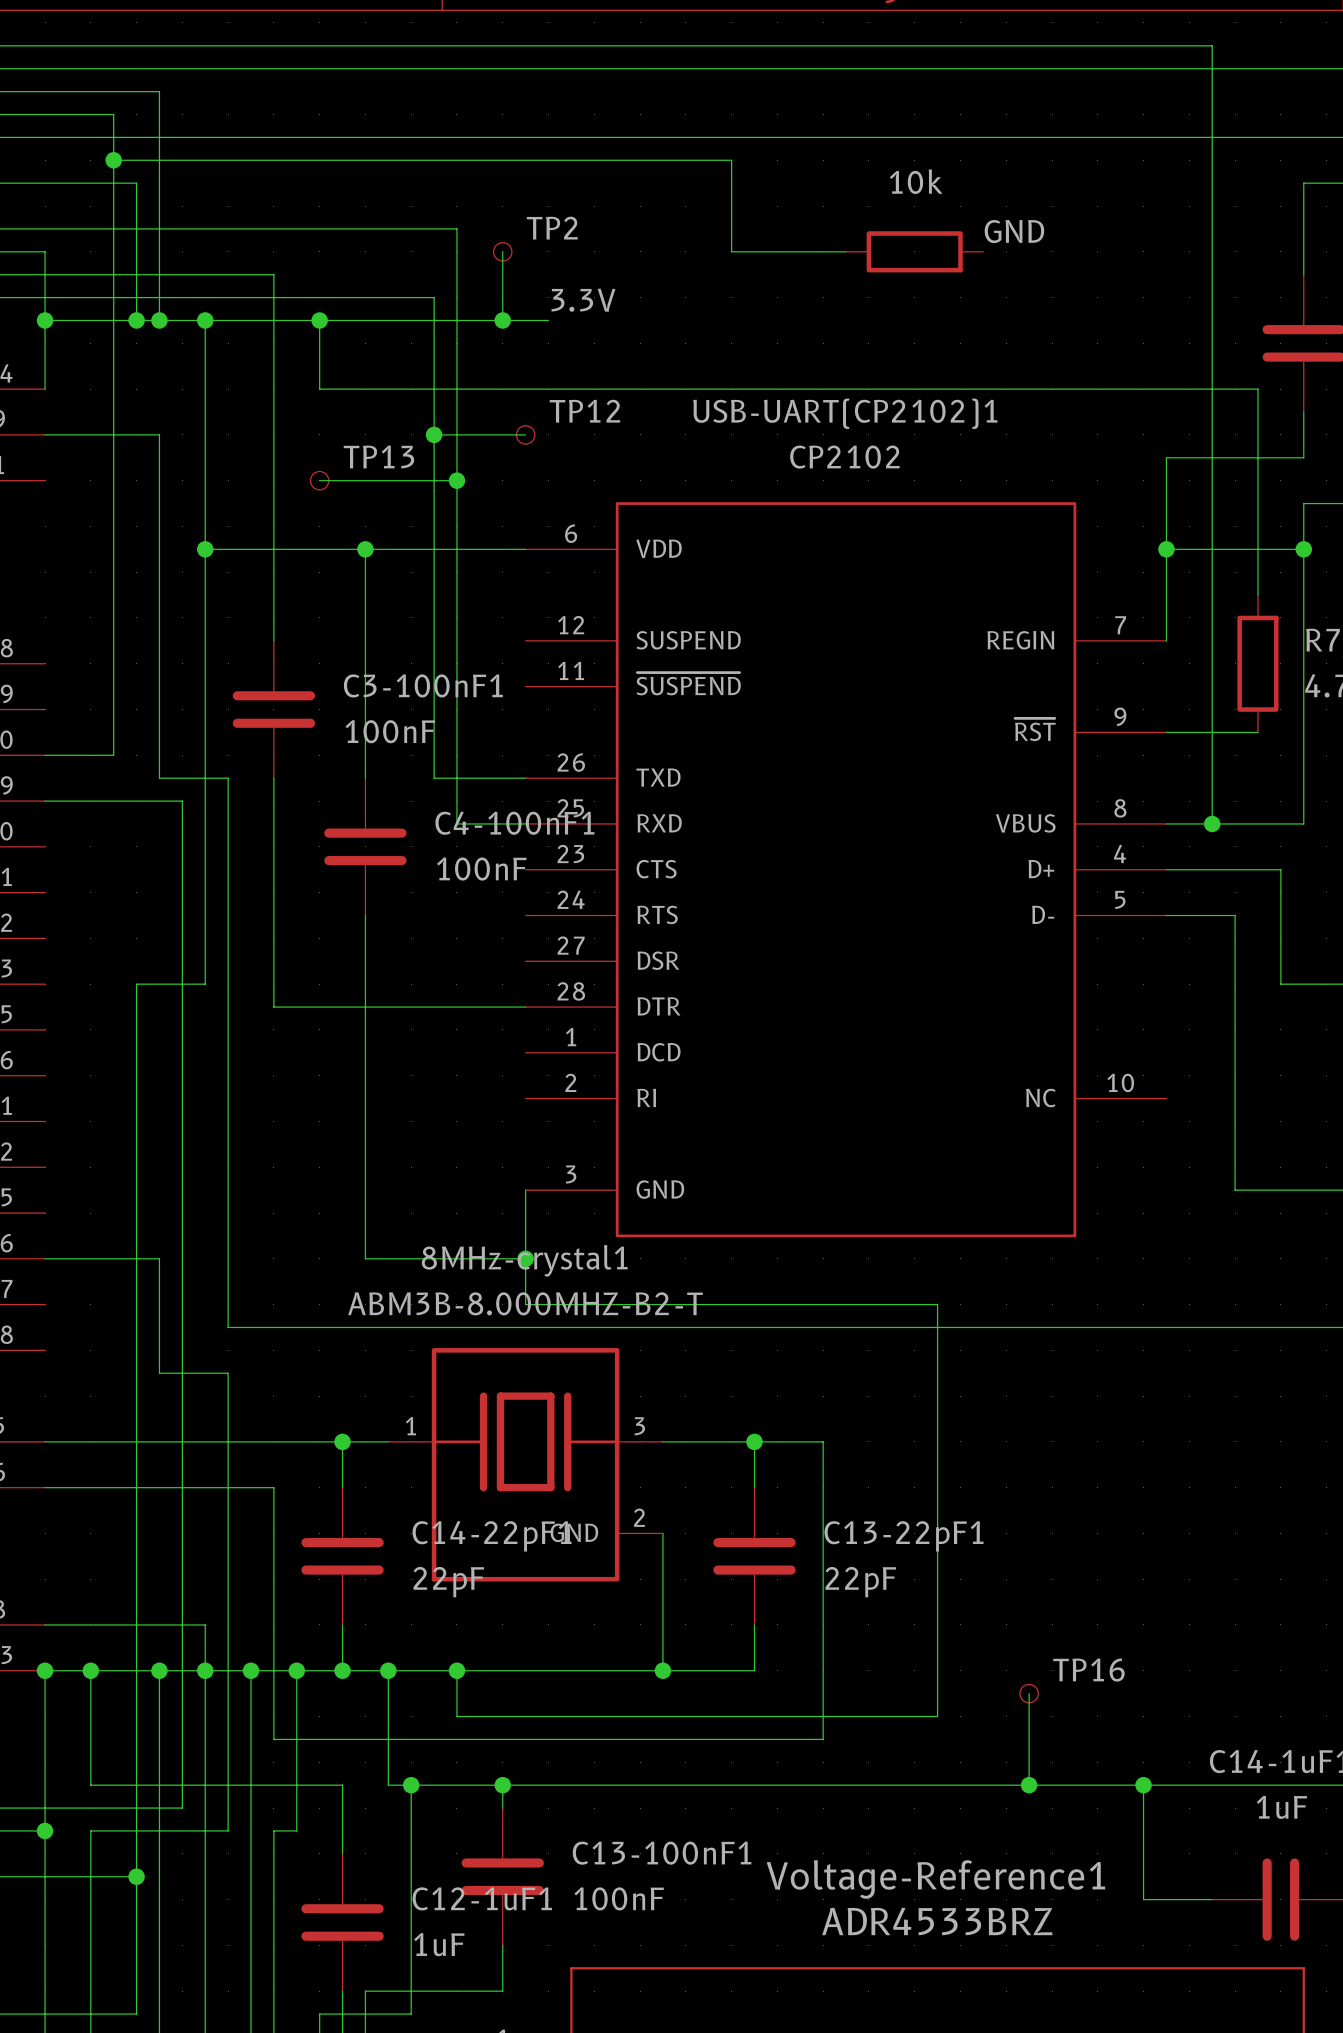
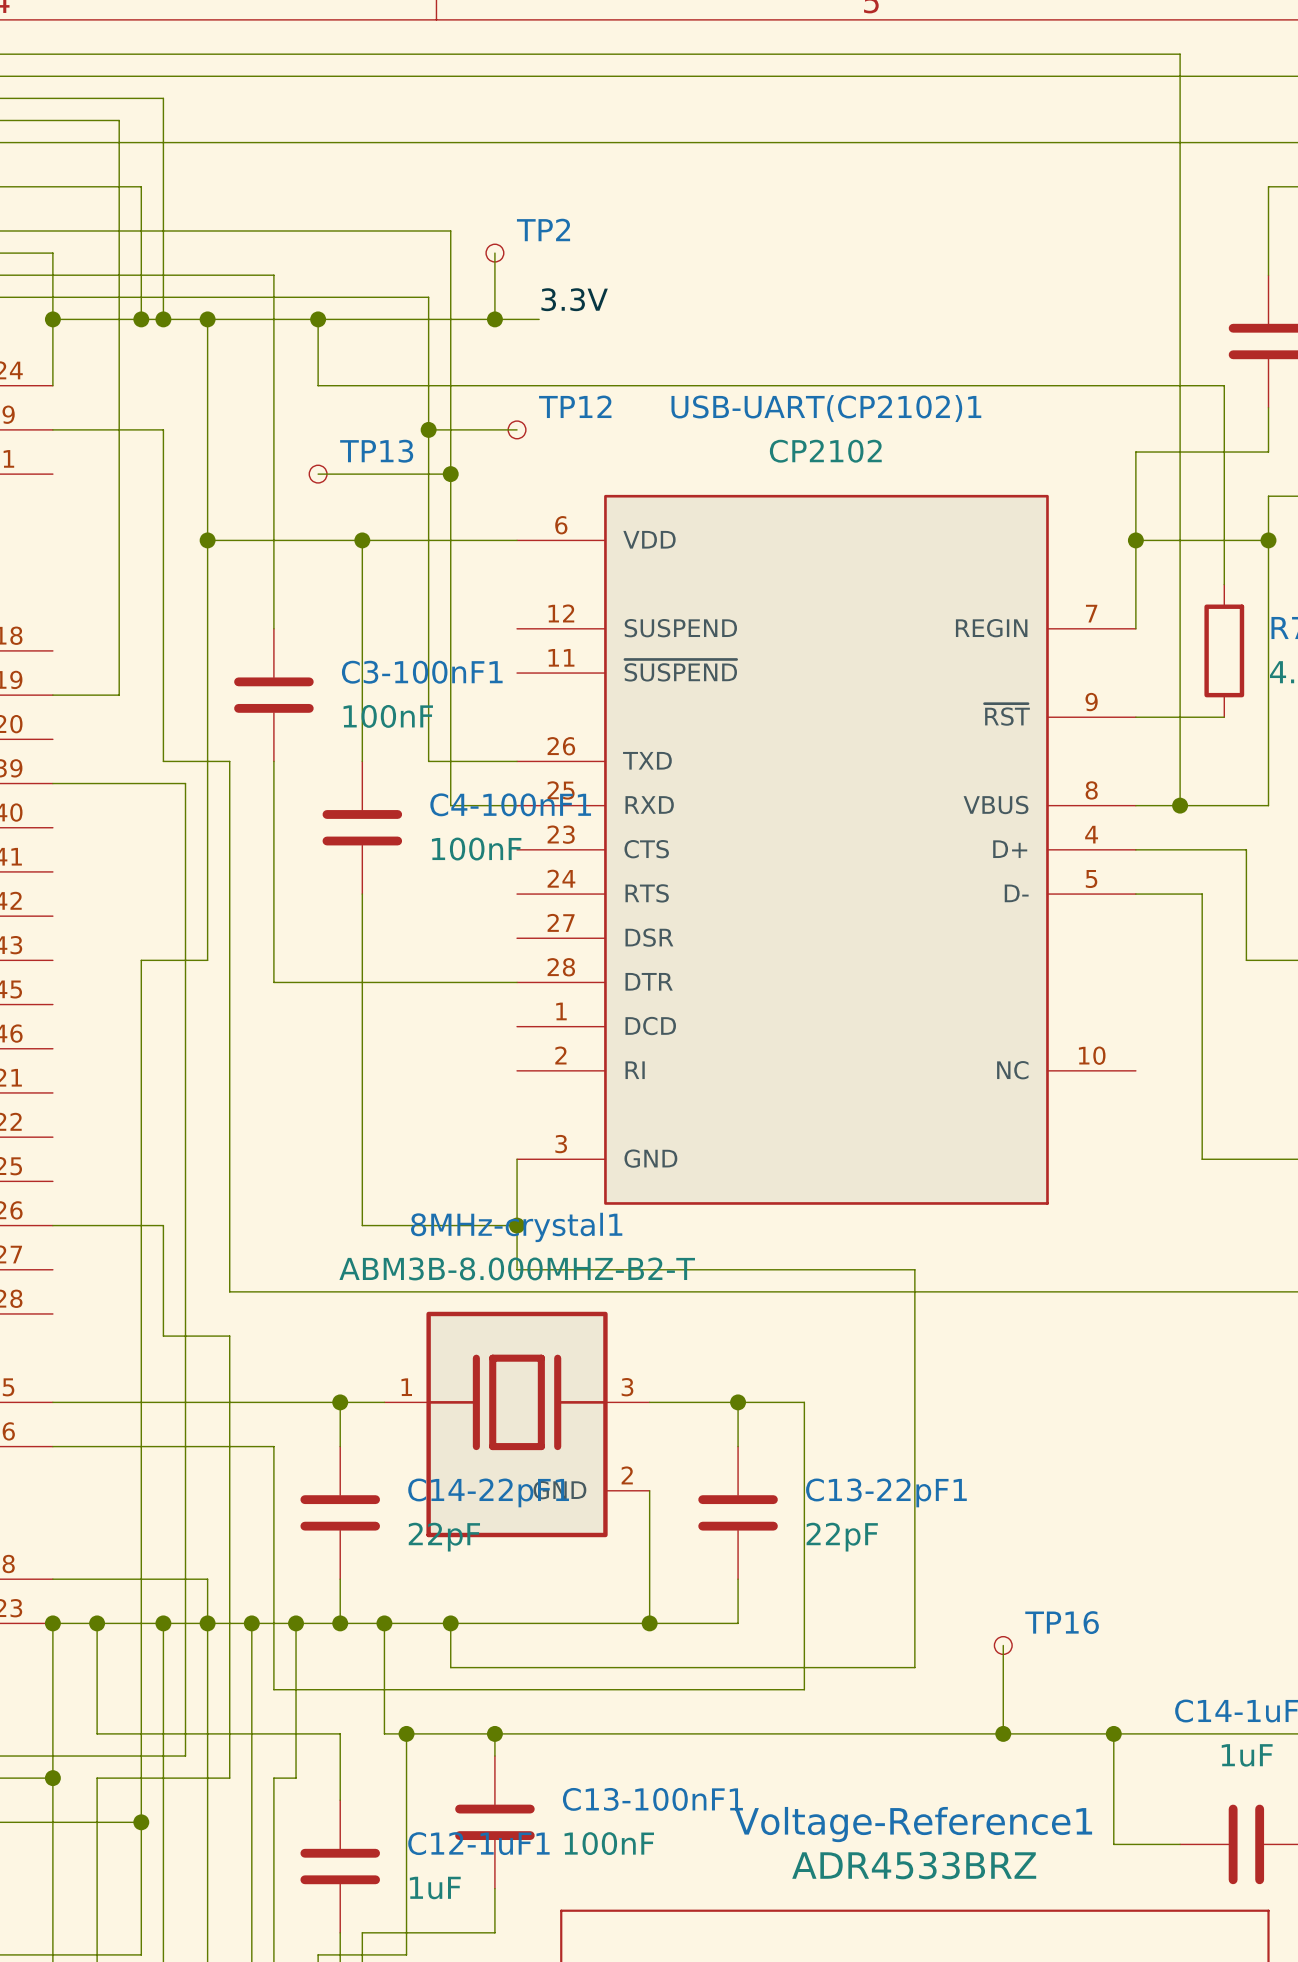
wire: (113, 160) (731, 160) (731, 251) (846, 251) -> none
junction: (113, 160) -> none
label: GND (1014, 231) -> none
part: 10k (914, 251) -> none
wire: (113, 709) (113, 755) (45, 755) -> (119, 695) (52, 695)

